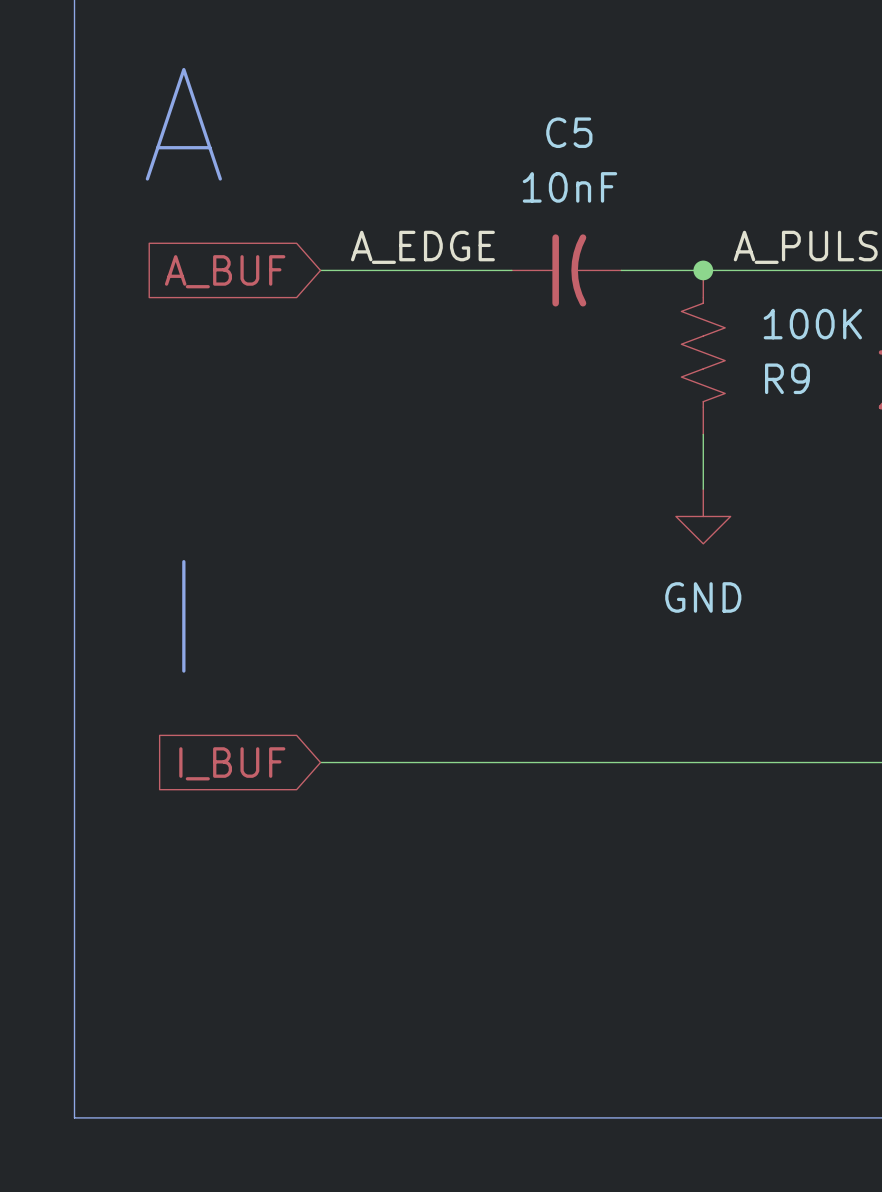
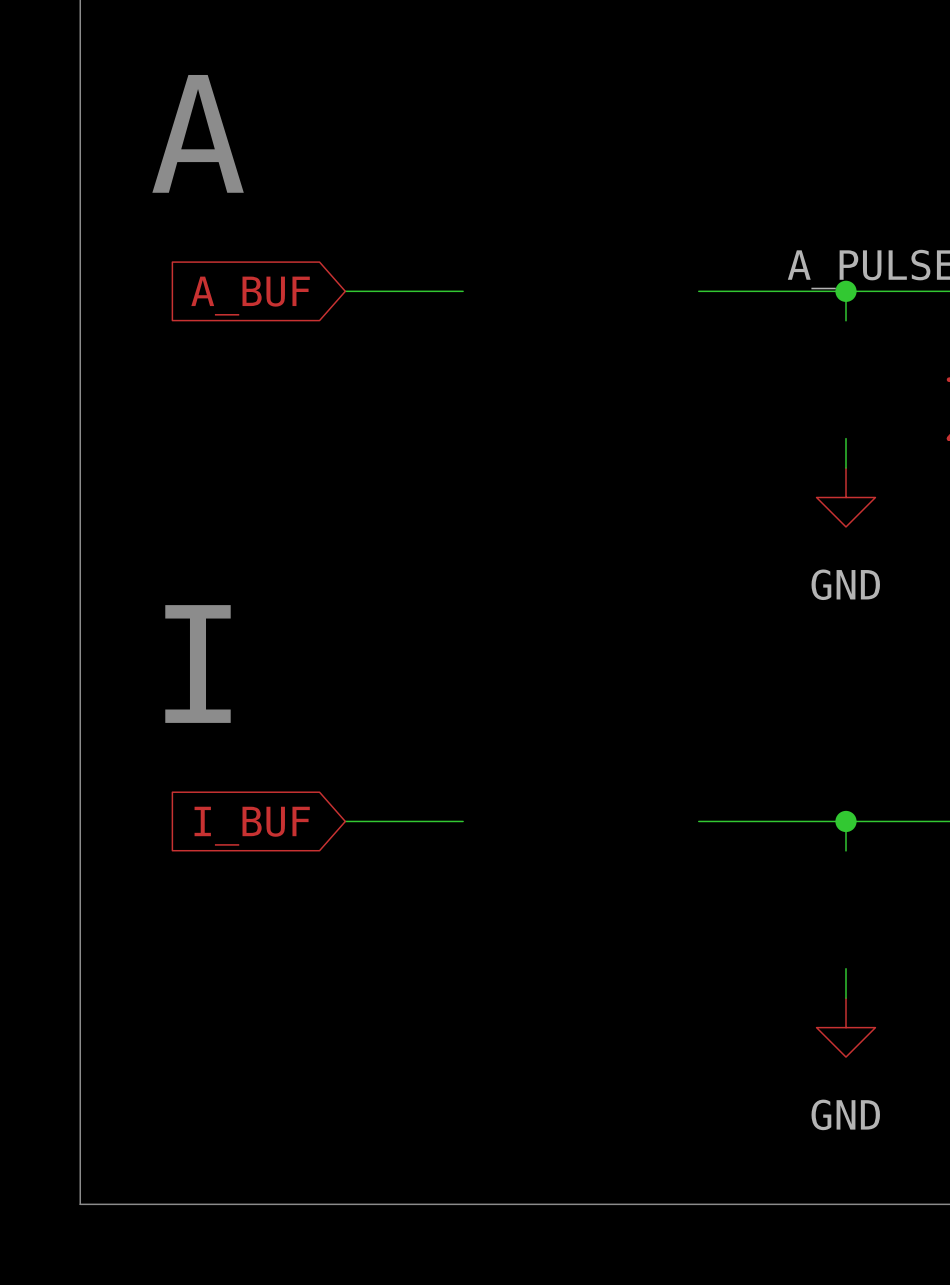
label: A_EDGE (422, 247) -> none
wire: (429, 270) (511, 270) -> none
C5: 10nF (566, 270) -> none
wire: (621, 270) (648, 270) -> none
junction: (703, 270) -> none
wire: none -> (846, 291) (846, 320)
junction: none -> (846, 291)
R9: 100K (703, 352) -> none
wire: none -> (846, 438) (846, 468)
wire: (703, 434) (703, 489) -> none
power symbol position: GND (703, 516) -> GND (846, 497)
wire: (429, 762) (648, 762) -> none
wire: none -> (846, 821) (846, 850)
junction: none -> (846, 821)
wire: none -> (846, 968) (846, 998)
power symbol: none -> GND (846, 1027)

